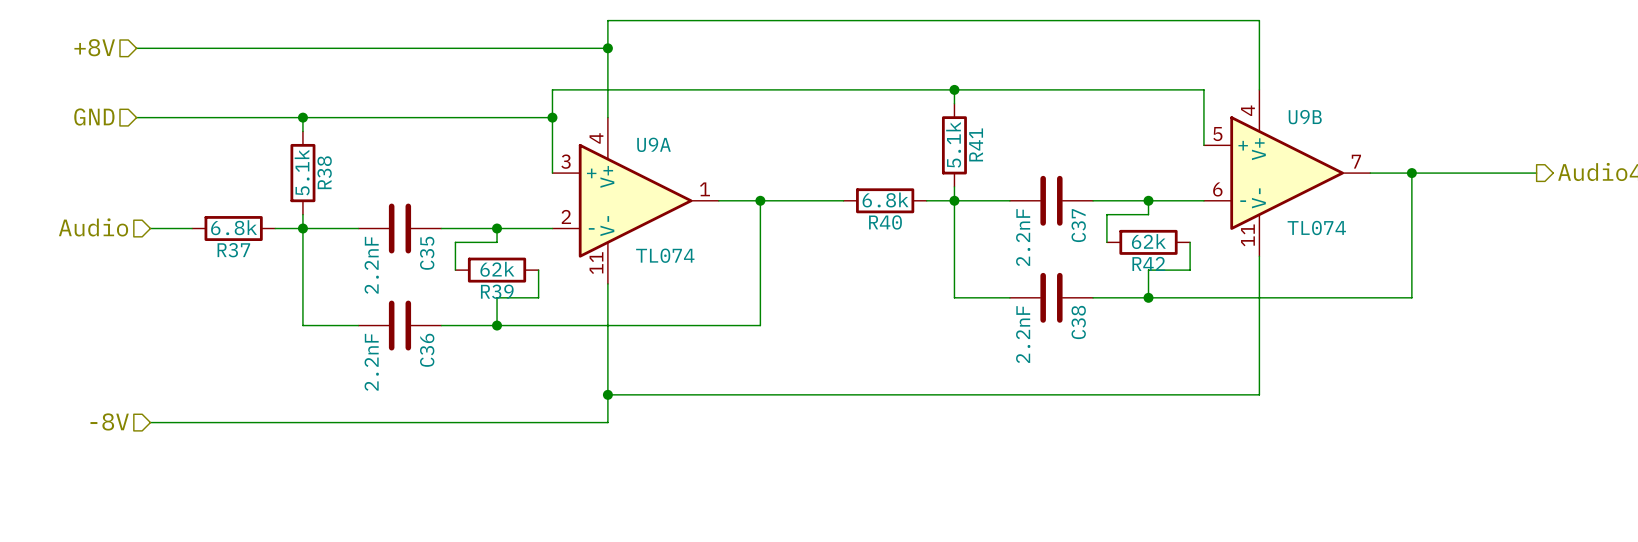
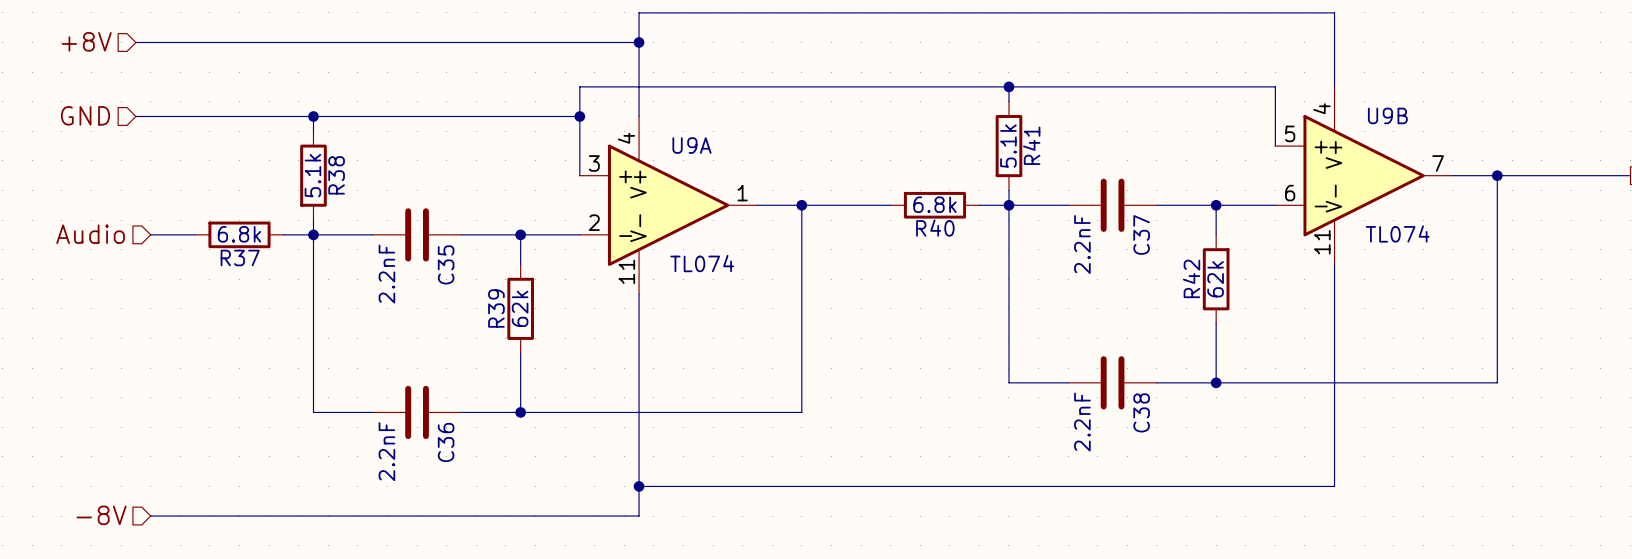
wire: (1148, 214) (1106, 214) (1106, 242) -> (1216, 220) (1216, 234)
wire: (497, 242) (455, 242) (455, 270) -> (520, 249) (520, 264)
R42 rotation: 0° (1148, 242) -> 90° clockwise (1216, 279)
wire: (1190, 242) (1190, 270) (1148, 270) (1148, 297) -> none
R39 rotation: 0° (497, 270) -> 90° clockwise (520, 308)
wire: (538, 270) (538, 297) (497, 297) (497, 325) -> none
wire: (954, 297) (1009, 297) -> (1008, 308) (1008, 382) (1068, 382)
C38 position: (1051, 297) -> (1112, 382)
wire: (1093, 297) (1411, 297) -> (1156, 382) (1497, 382) (1497, 308)
junction: (1148, 297) -> none
wire: none -> (1216, 323) (1216, 382)
wire: (302, 325) (358, 325) -> (313, 338) (313, 412) (372, 412)
C36 position: (399, 325) -> (417, 412)
wire: (441, 325) (760, 325) -> (801, 412) (801, 338)
junction: (497, 325) -> none
wire: none -> (520, 353) (520, 412)
junction: none -> (1216, 382)
wire: none -> (461, 412) (639, 412)
junction: none -> (520, 412)
junction: (607, 394) -> none
wire: (760, 394) (1259, 394) -> (639, 486) (1334, 486) (1334, 412)
hierarchical label position: -8V (109, 421) -> -8V (101, 515)
wire: (150, 422) (607, 422) -> (150, 516) (639, 516) (639, 442)
junction: none -> (639, 486)

